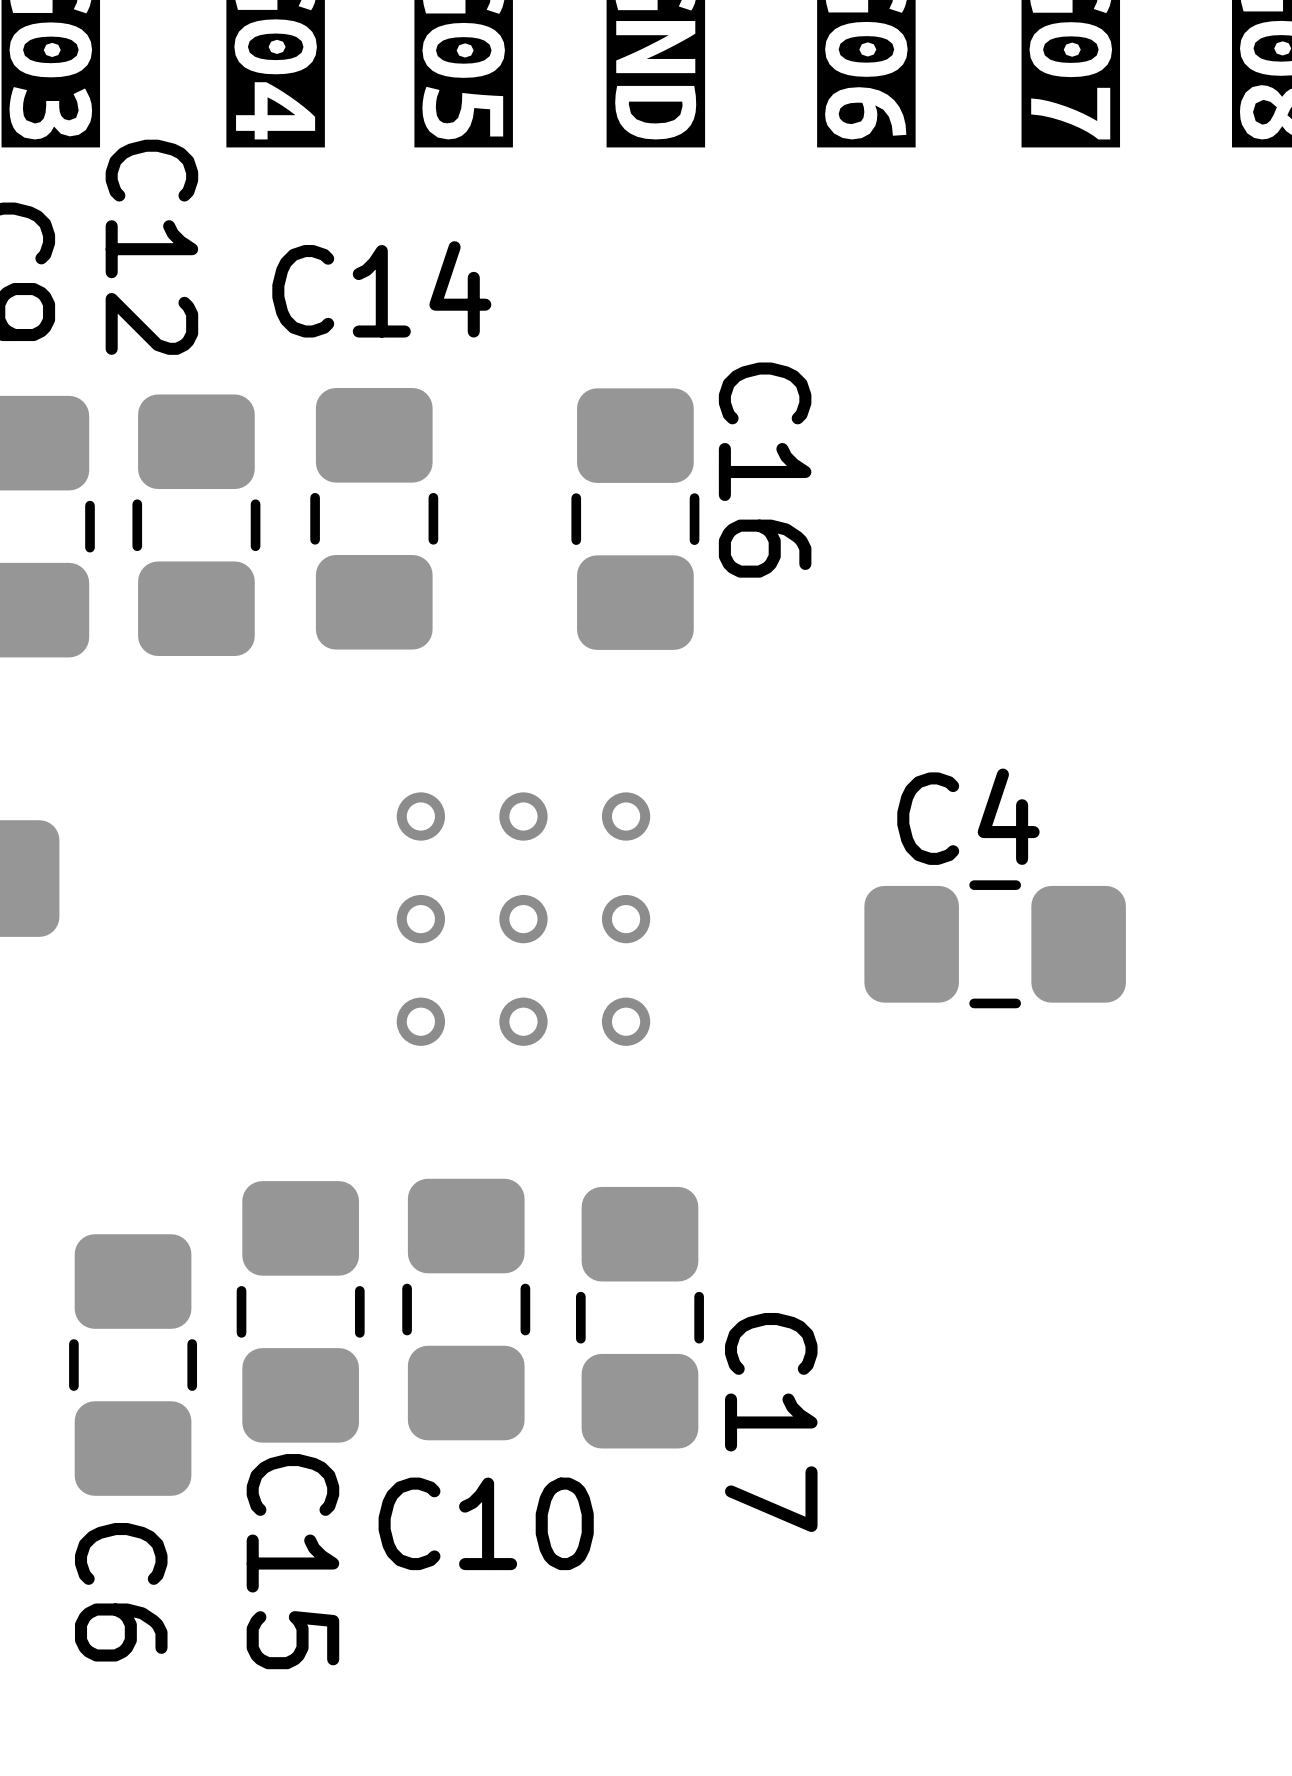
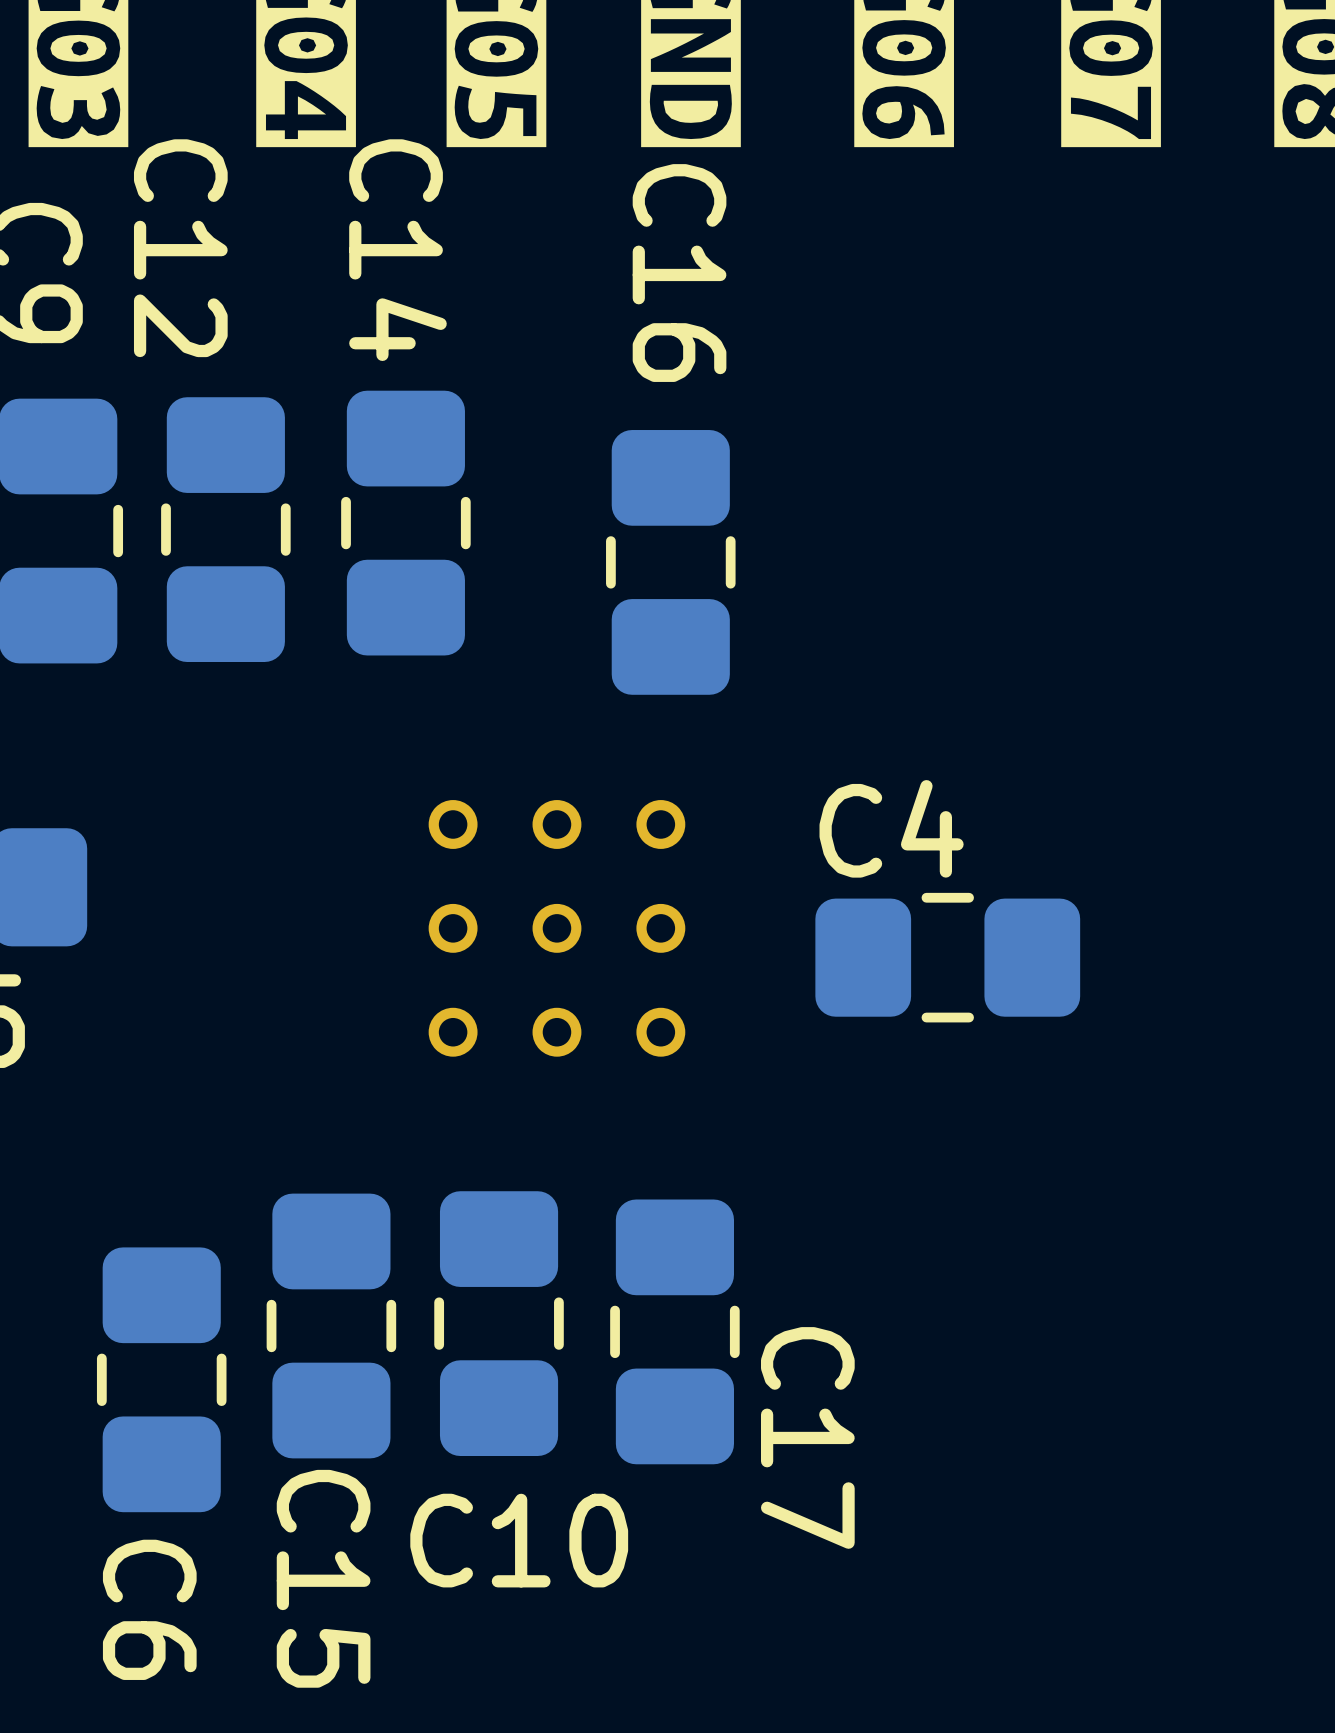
C14 name rotation: 0° (381, 289) -> 90° clockwise (397, 250)
C16 name position: C16 (765, 470) -> C16 (679, 273)
C16 position: (635, 519) -> (670, 562)
C4 name position: C4 (968, 816) -> C4 (891, 828)
C4 position: (995, 944) -> (947, 957)

